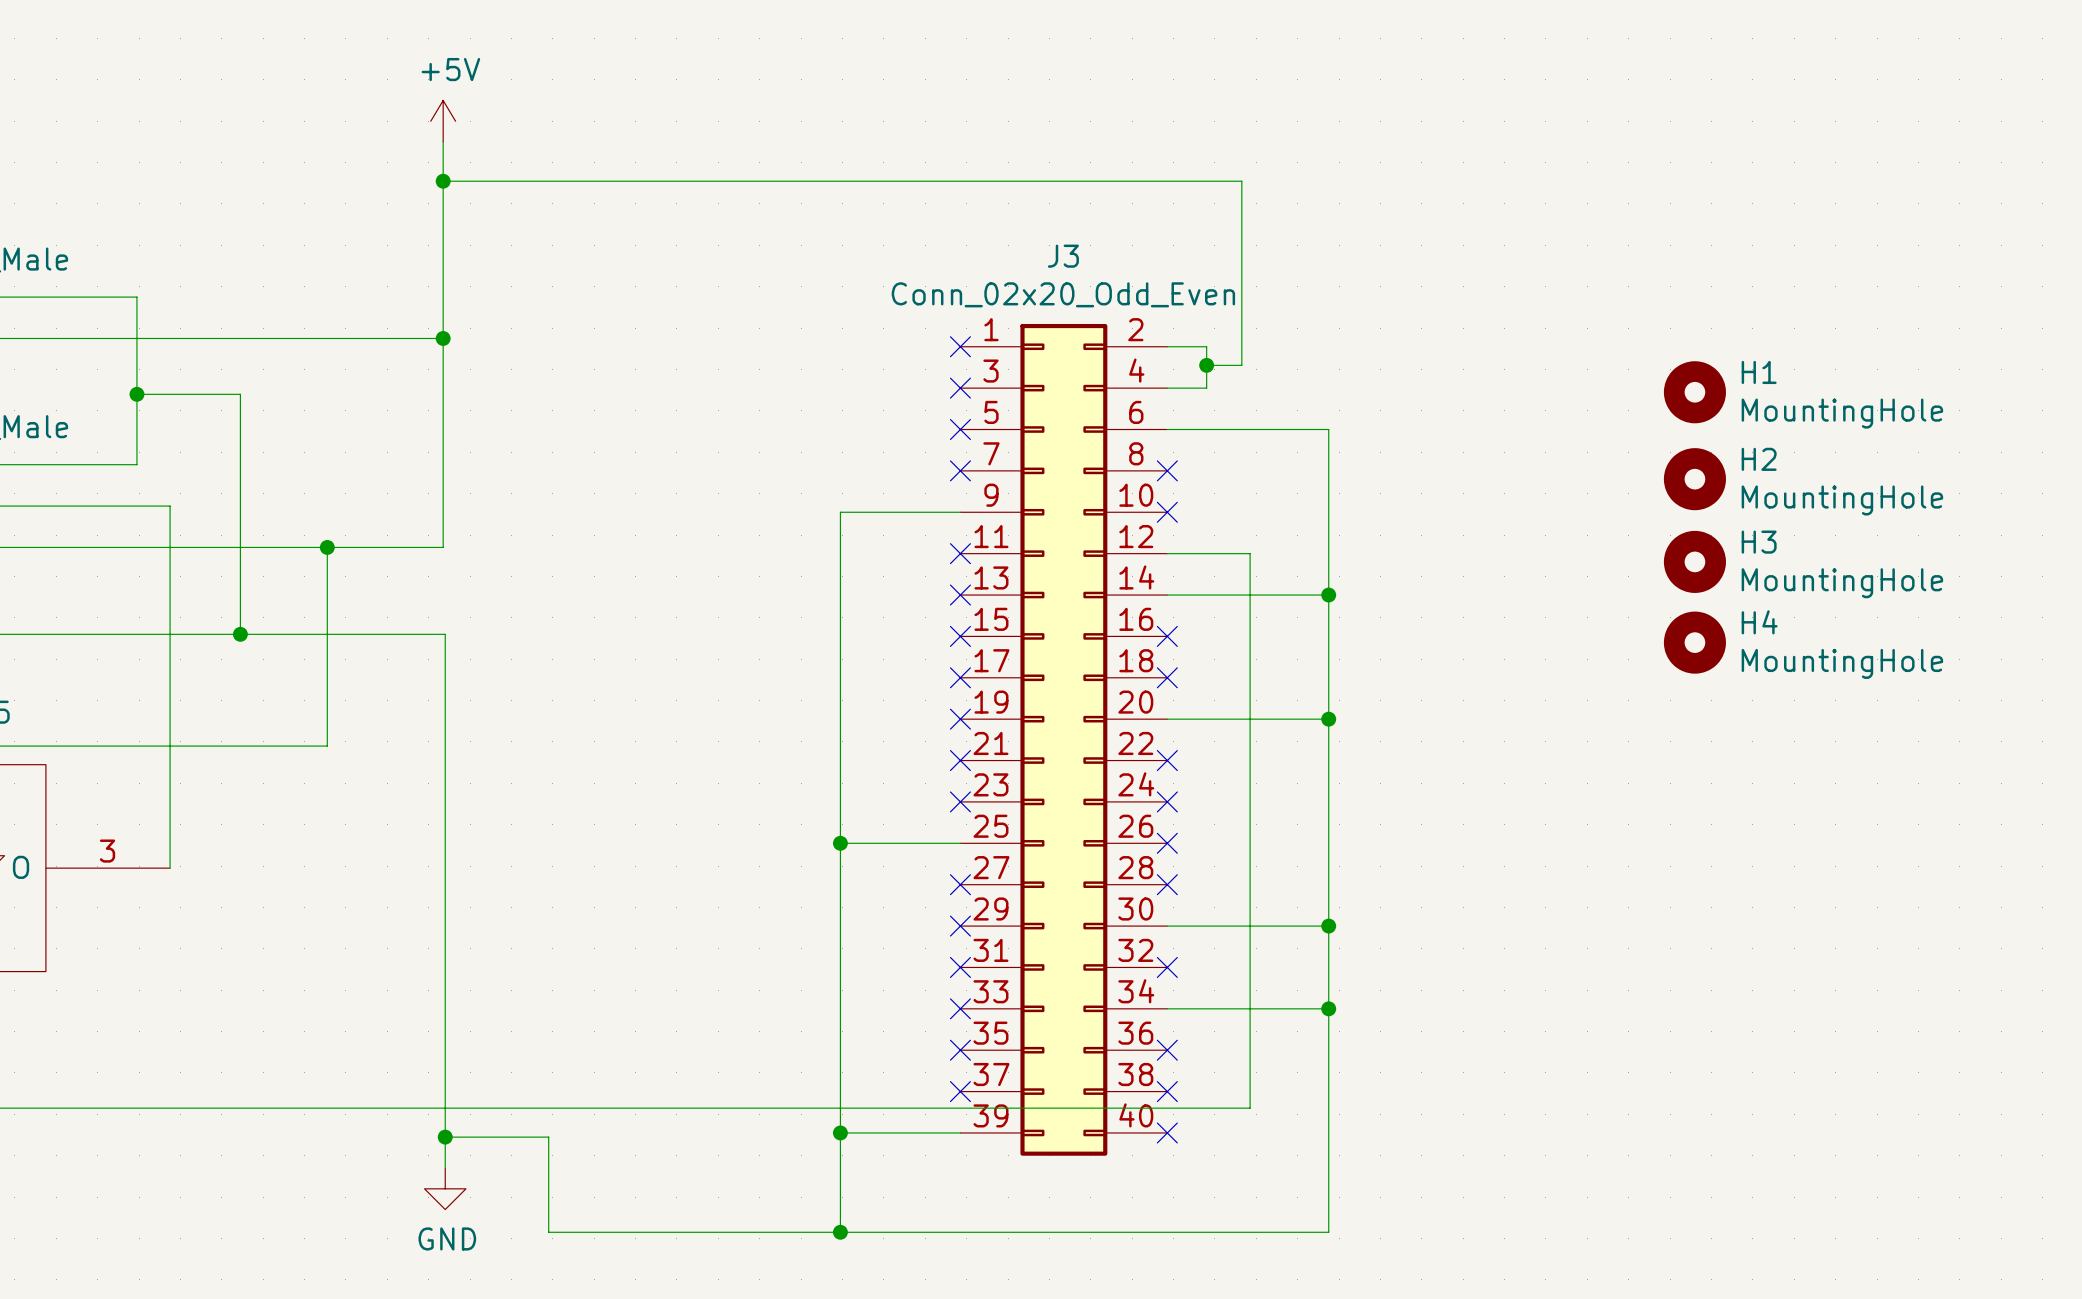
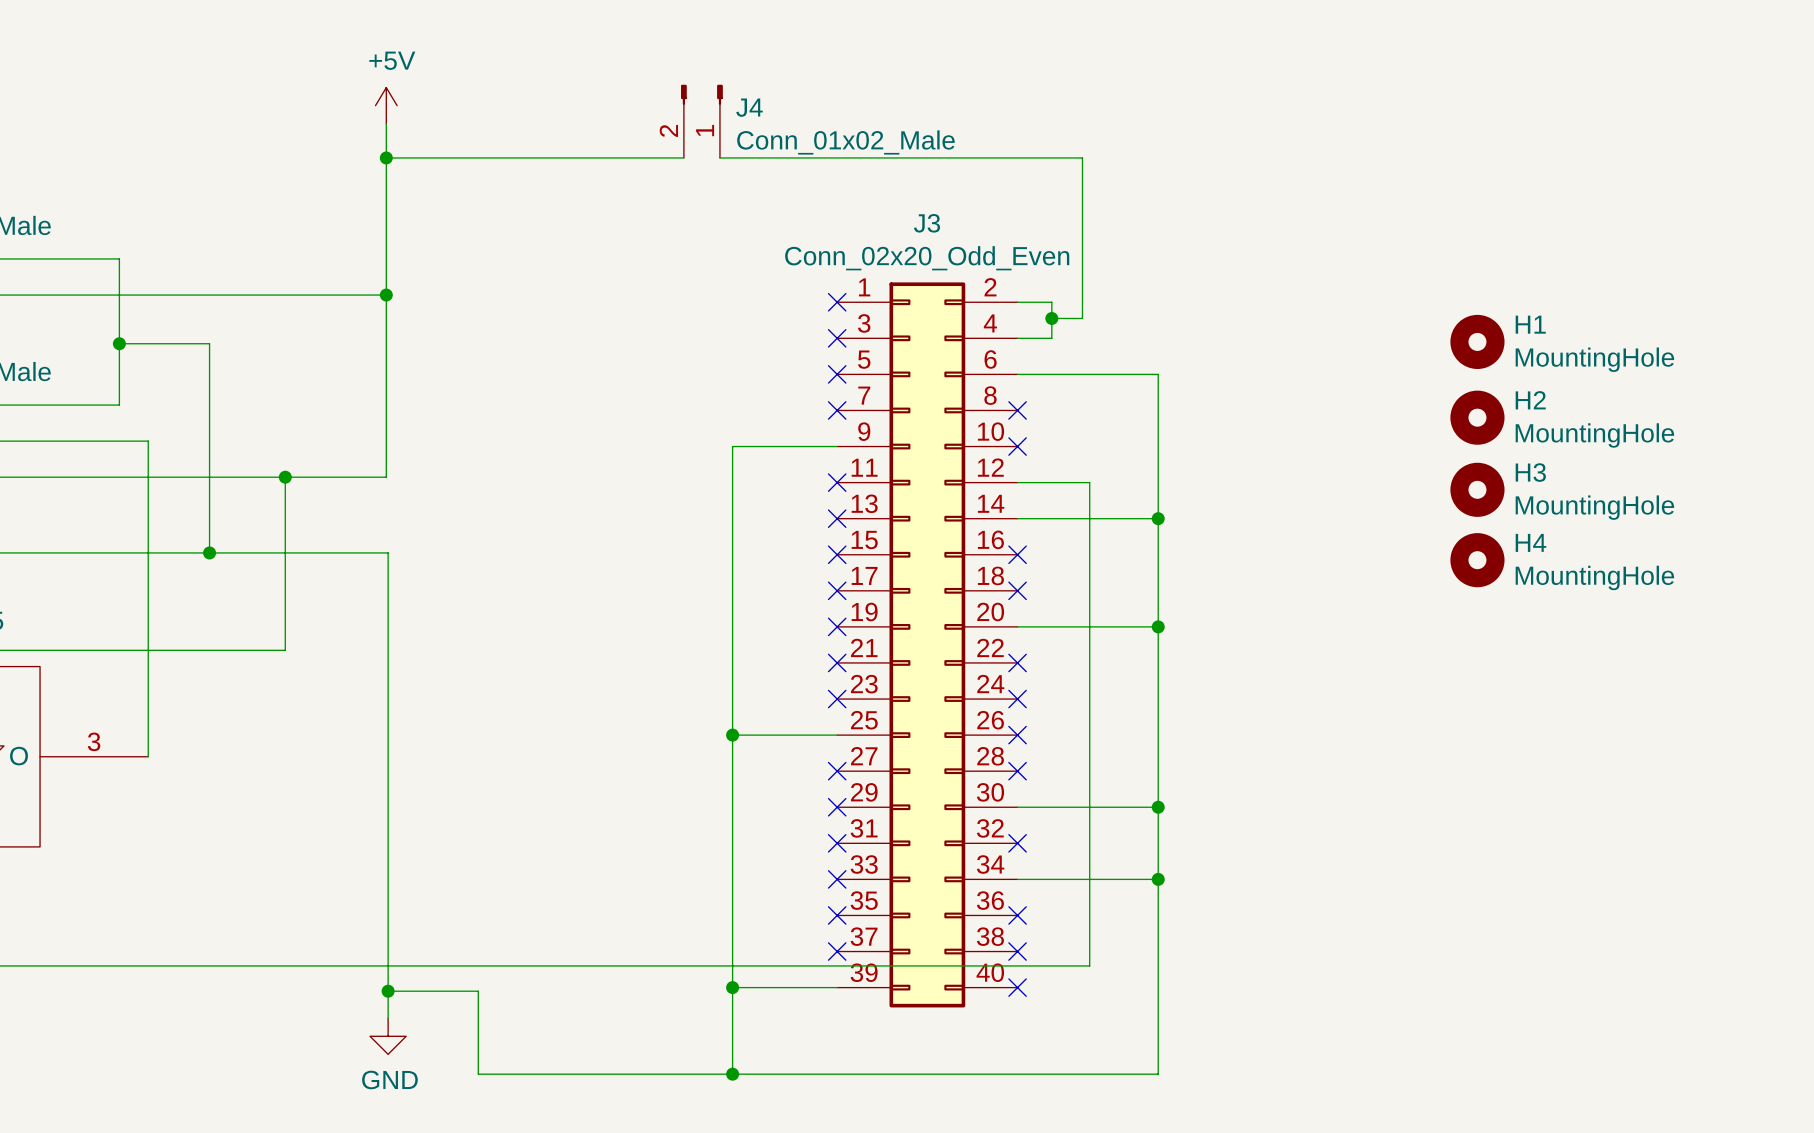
J4: none -> Conn_01x02_Male (701, 121)
wire: (784, 181) (825, 181) -> none

